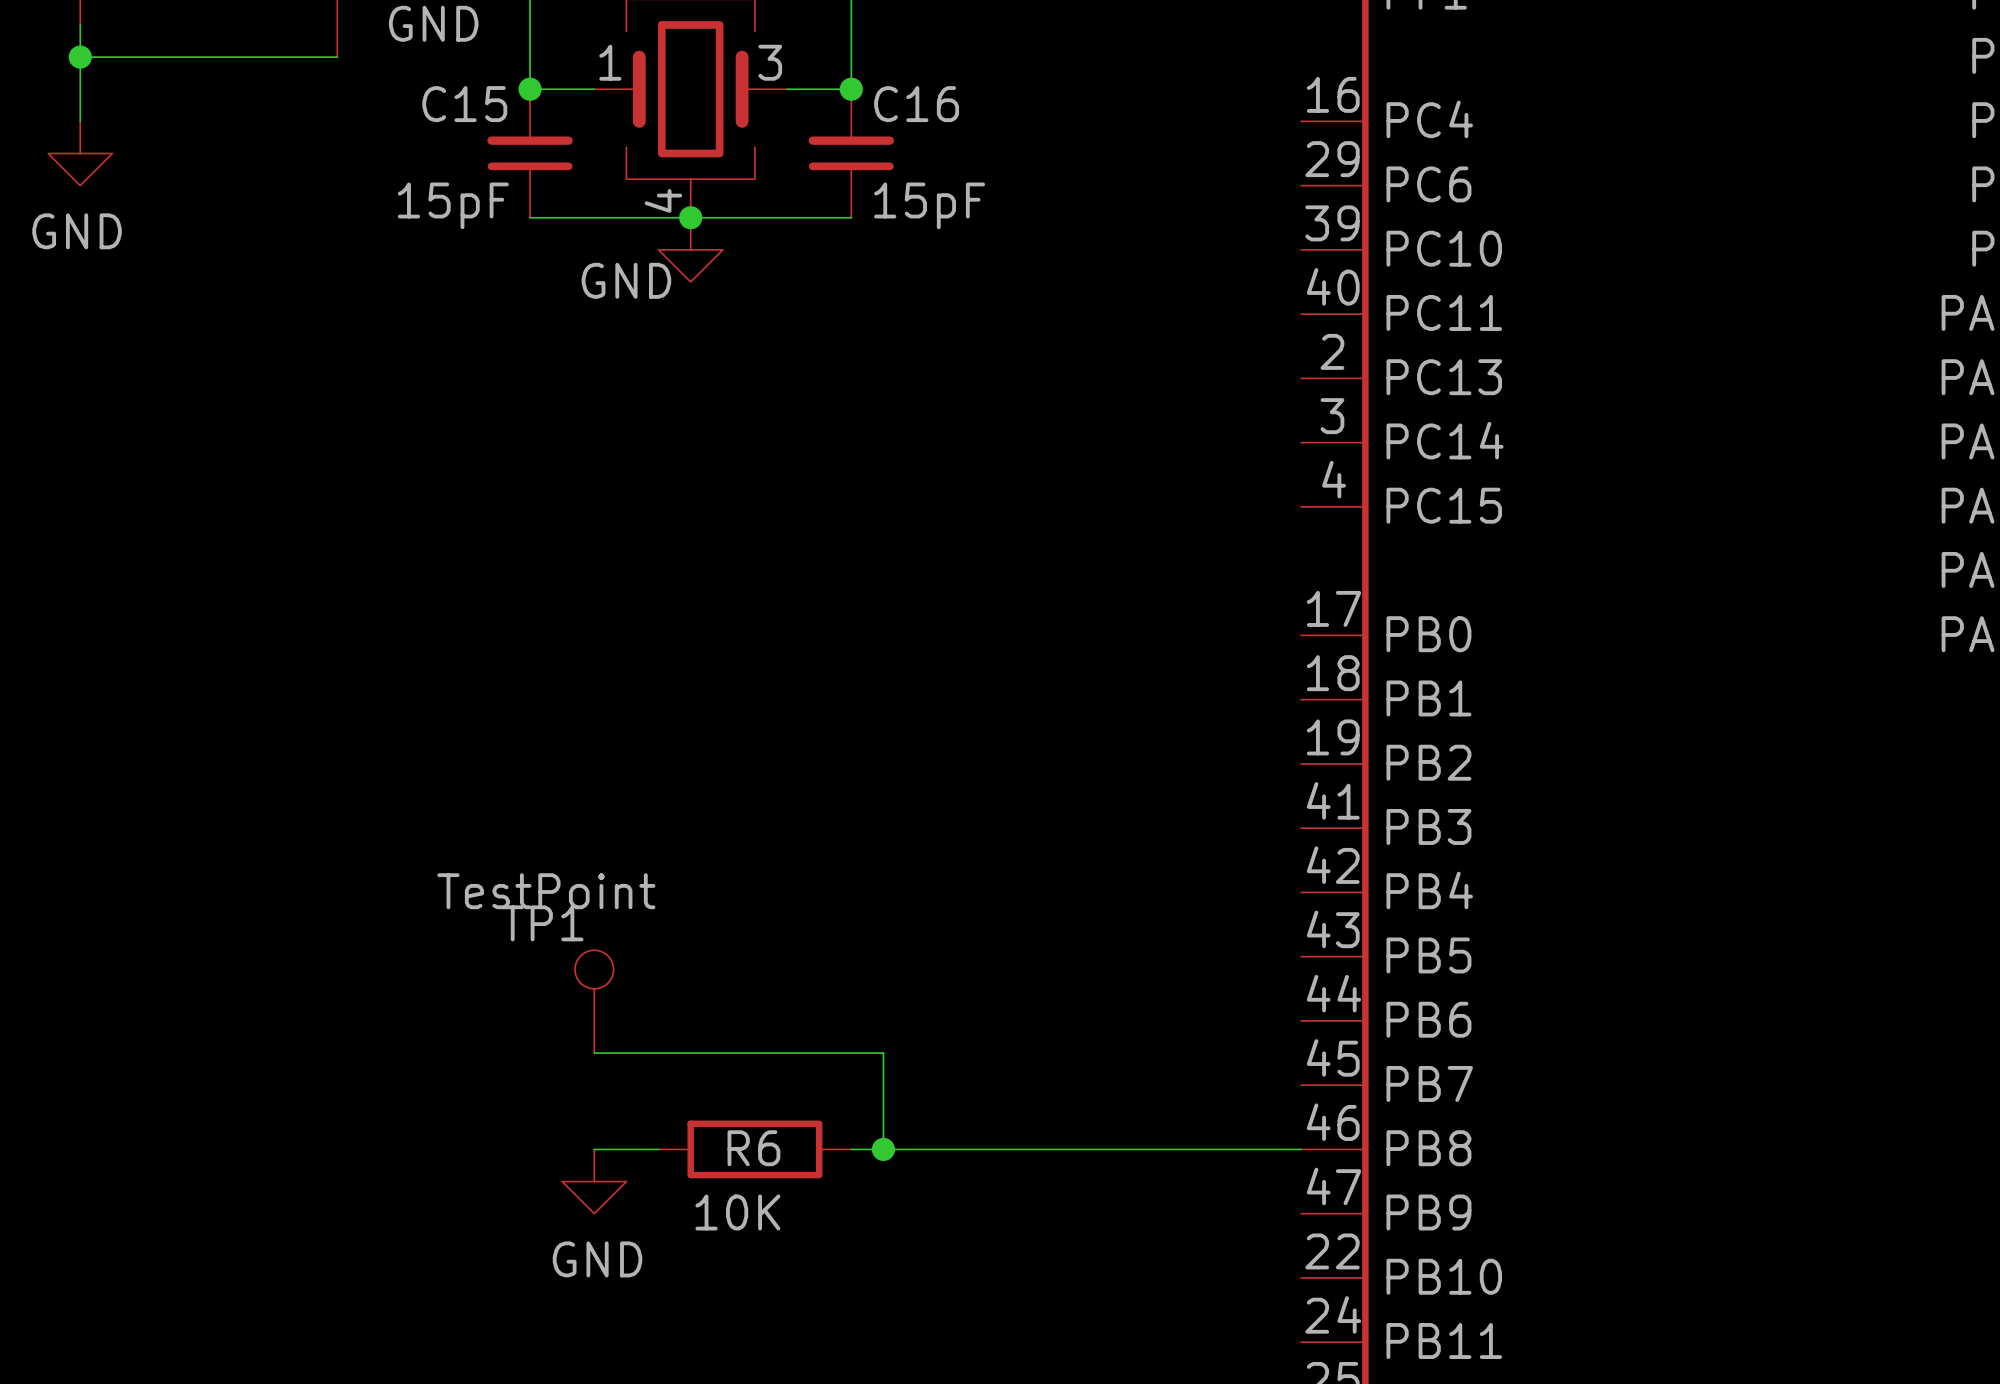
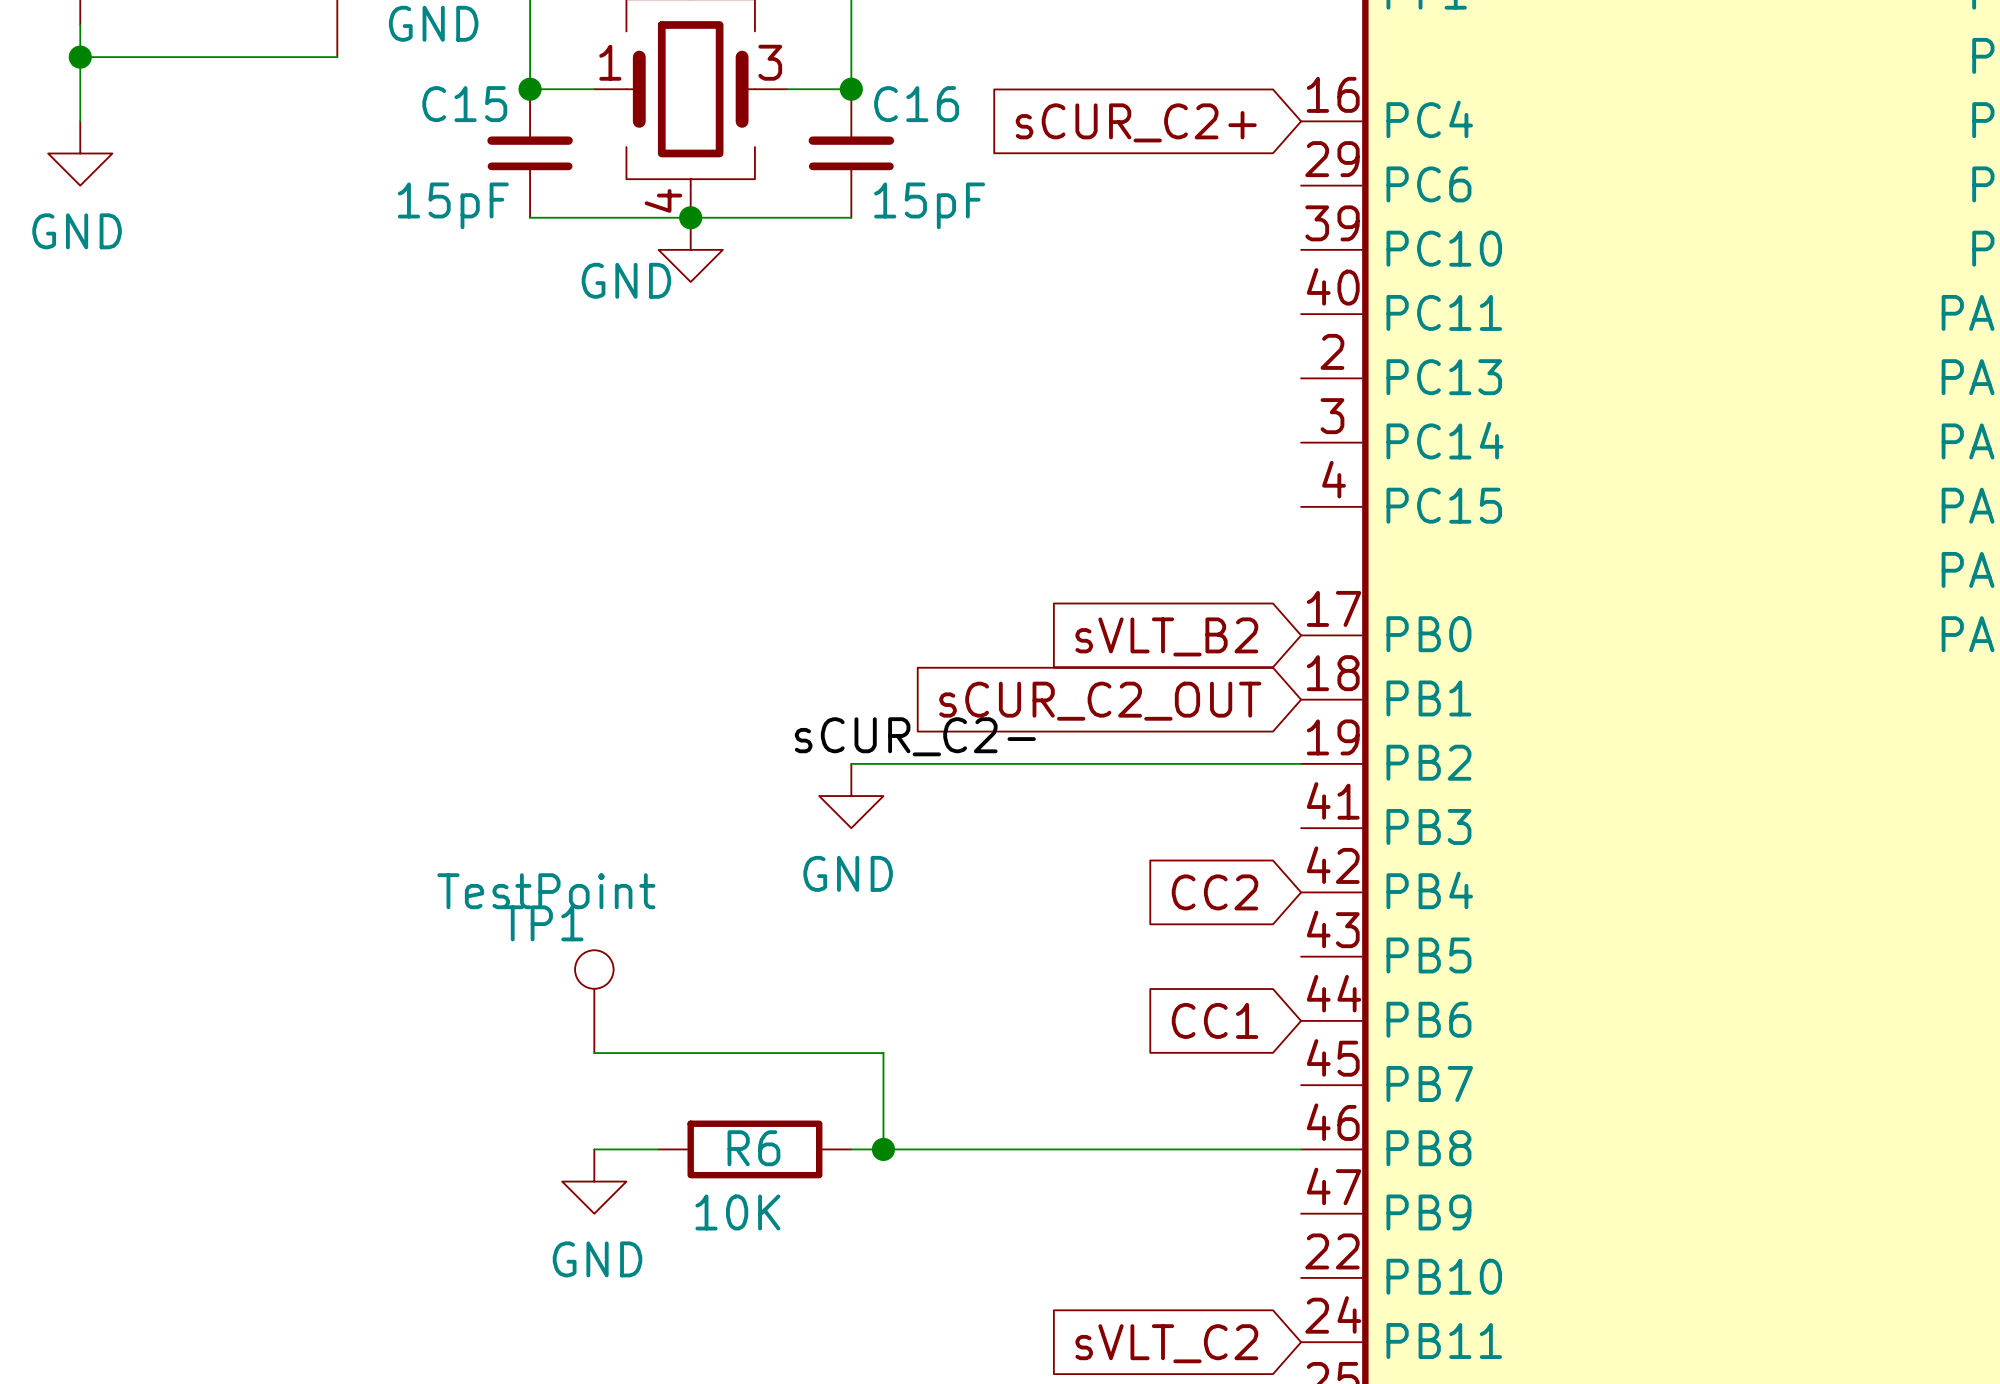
global label: none -> sCUR_C2+ (1136, 122)
global label: none -> sVLT_B2 (1166, 636)
global label: none -> sCUR_C2_OUT (1100, 701)
label: none -> sCUR_C2- (915, 736)
wire: none -> (851, 763) (1301, 763)
power symbol: none -> GND (851, 796)
global label: none -> CC2 (1215, 892)
global label: none -> CC1 (1215, 1020)
global label: none -> sVLT_C2 (1166, 1343)

